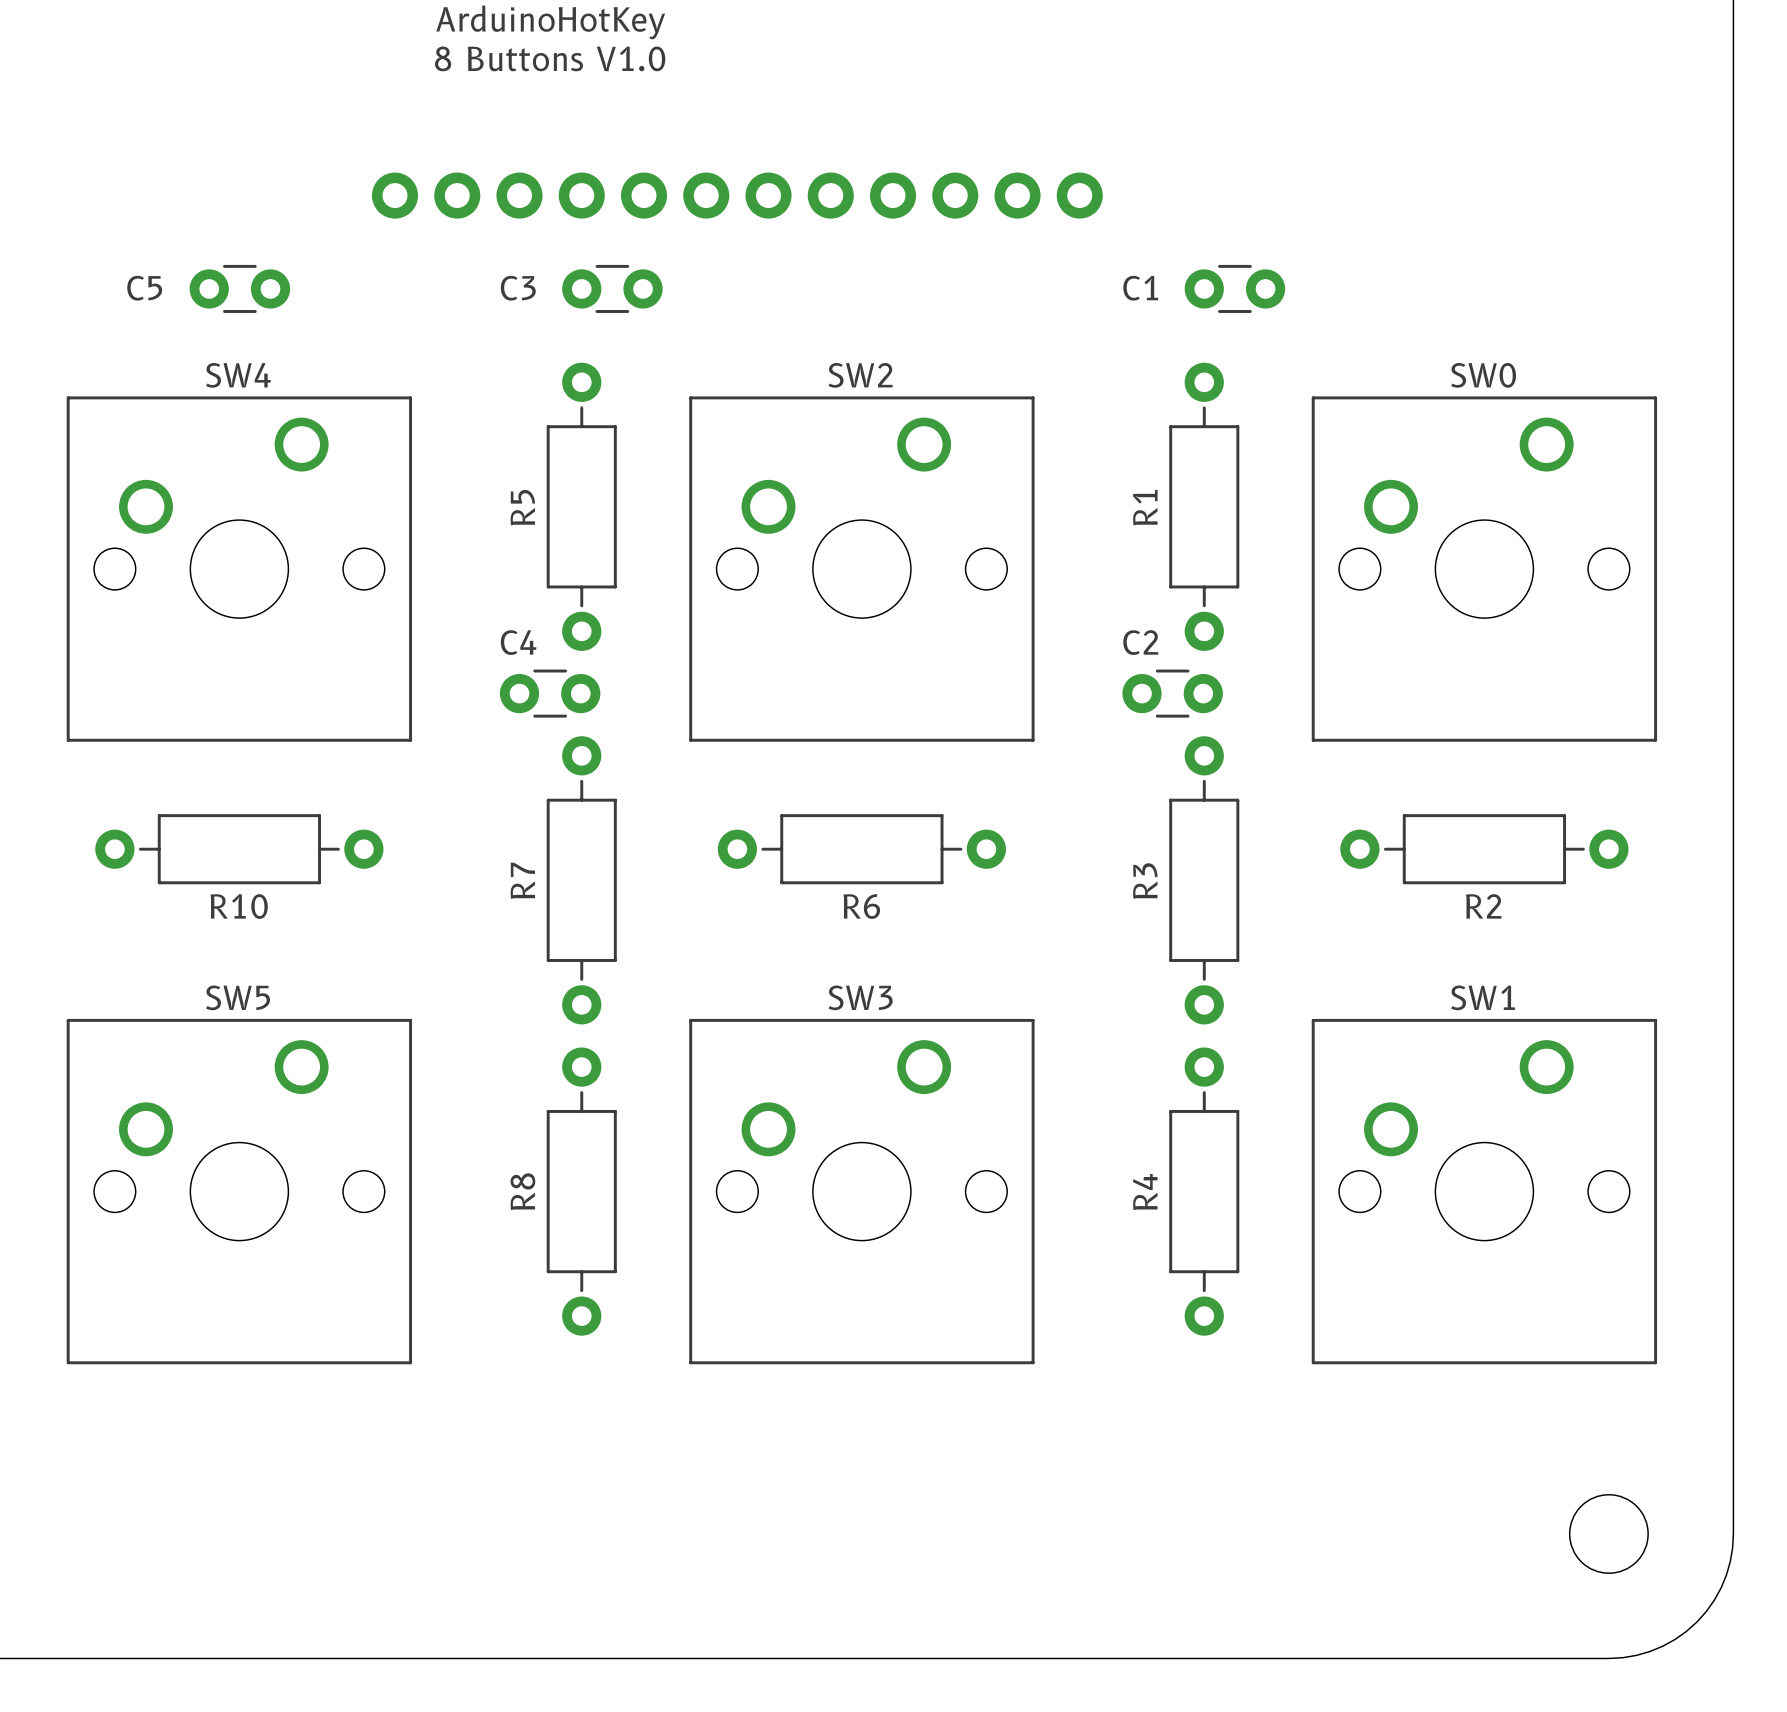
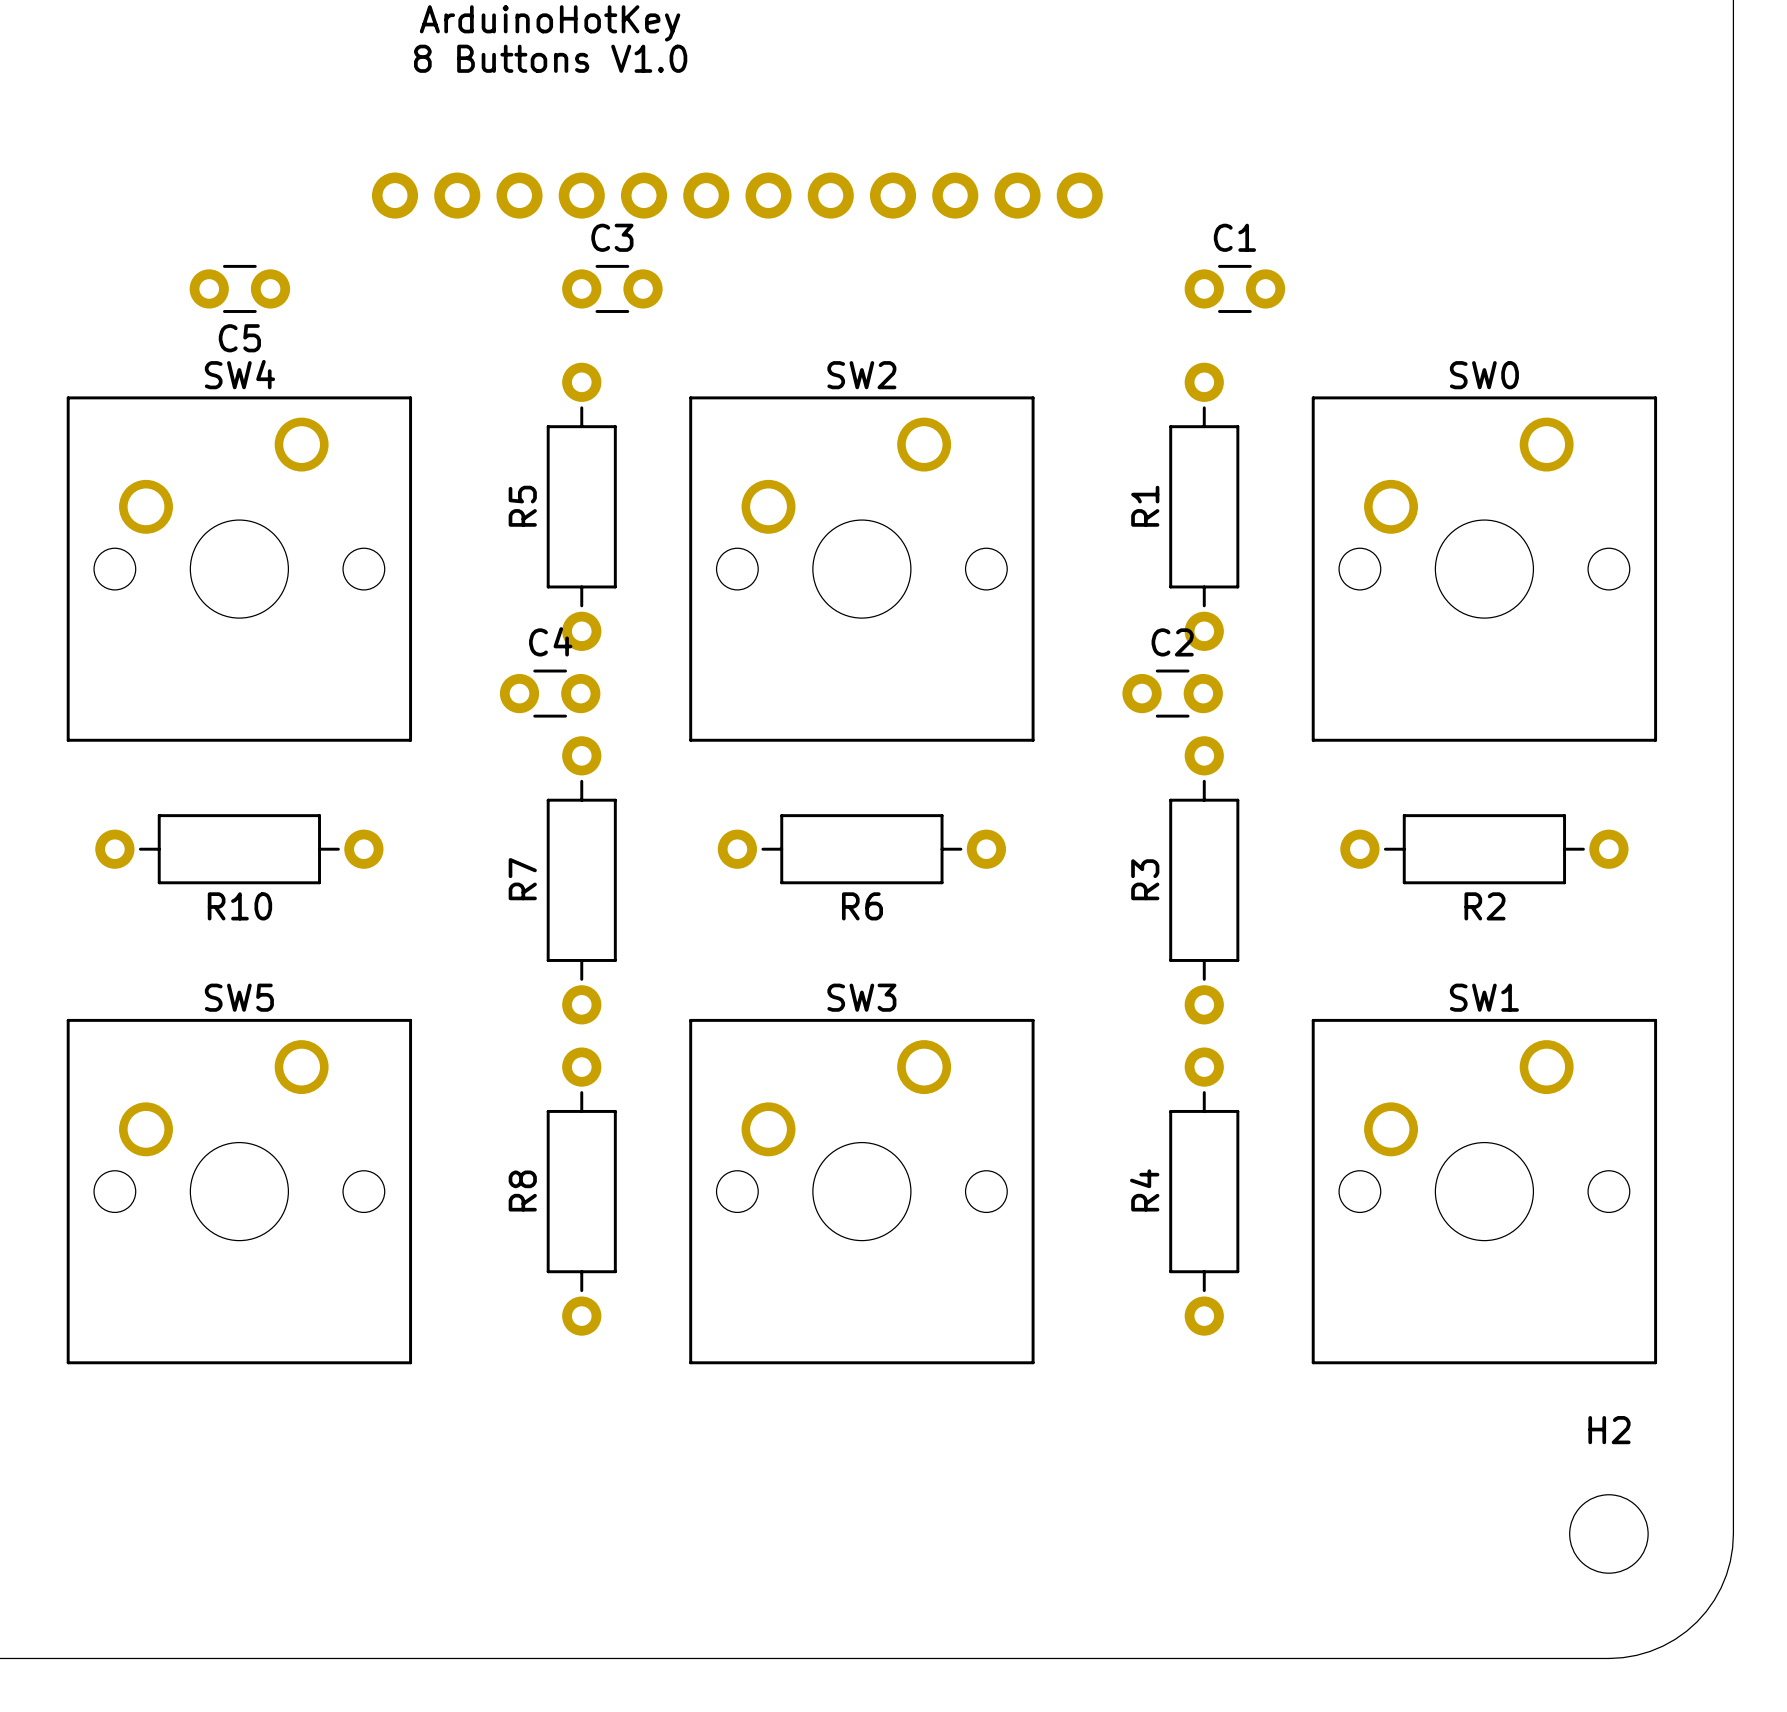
C5 name position: C5 (144, 288) -> C5 (239, 338)
C3 name position: C3 (518, 288) -> C3 (612, 237)
C1 name position: C1 (1140, 288) -> C1 (1234, 237)
C4 name position: C4 (518, 642) -> C4 (550, 641)
C2 name position: C2 (1140, 642) -> C2 (1172, 642)
H2 name: none -> H2 (1609, 1430)

